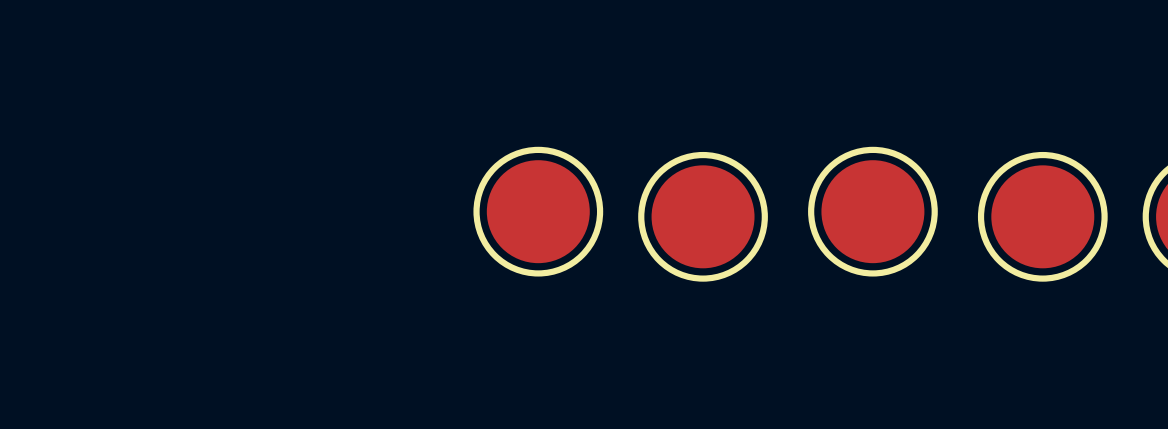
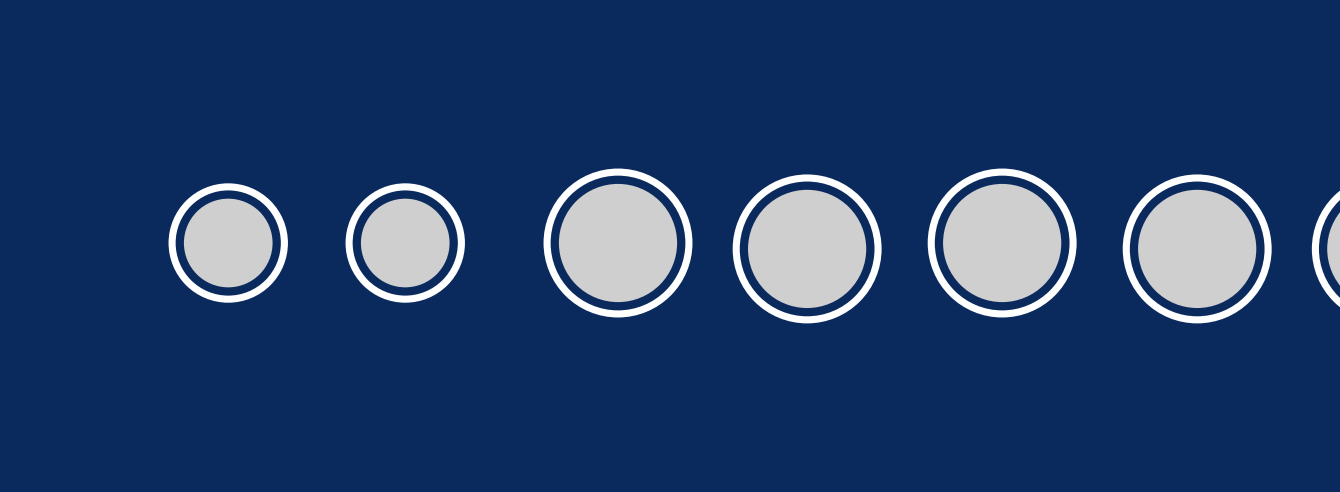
part: none -> (228, 243)
part: none -> (405, 243)

